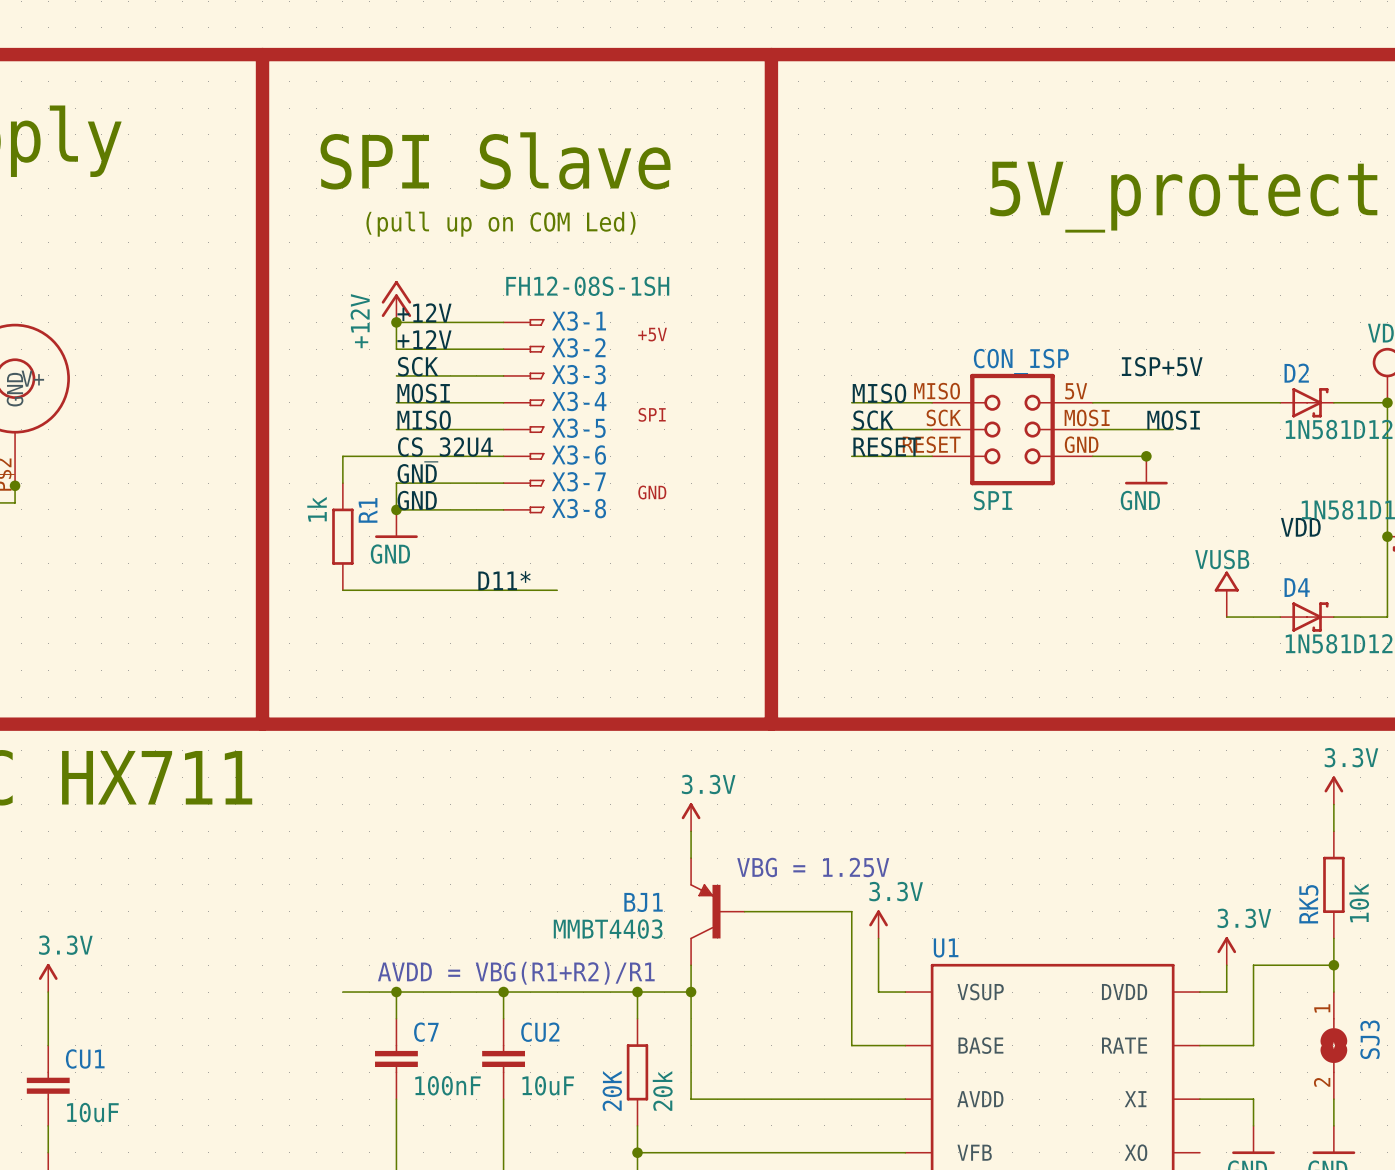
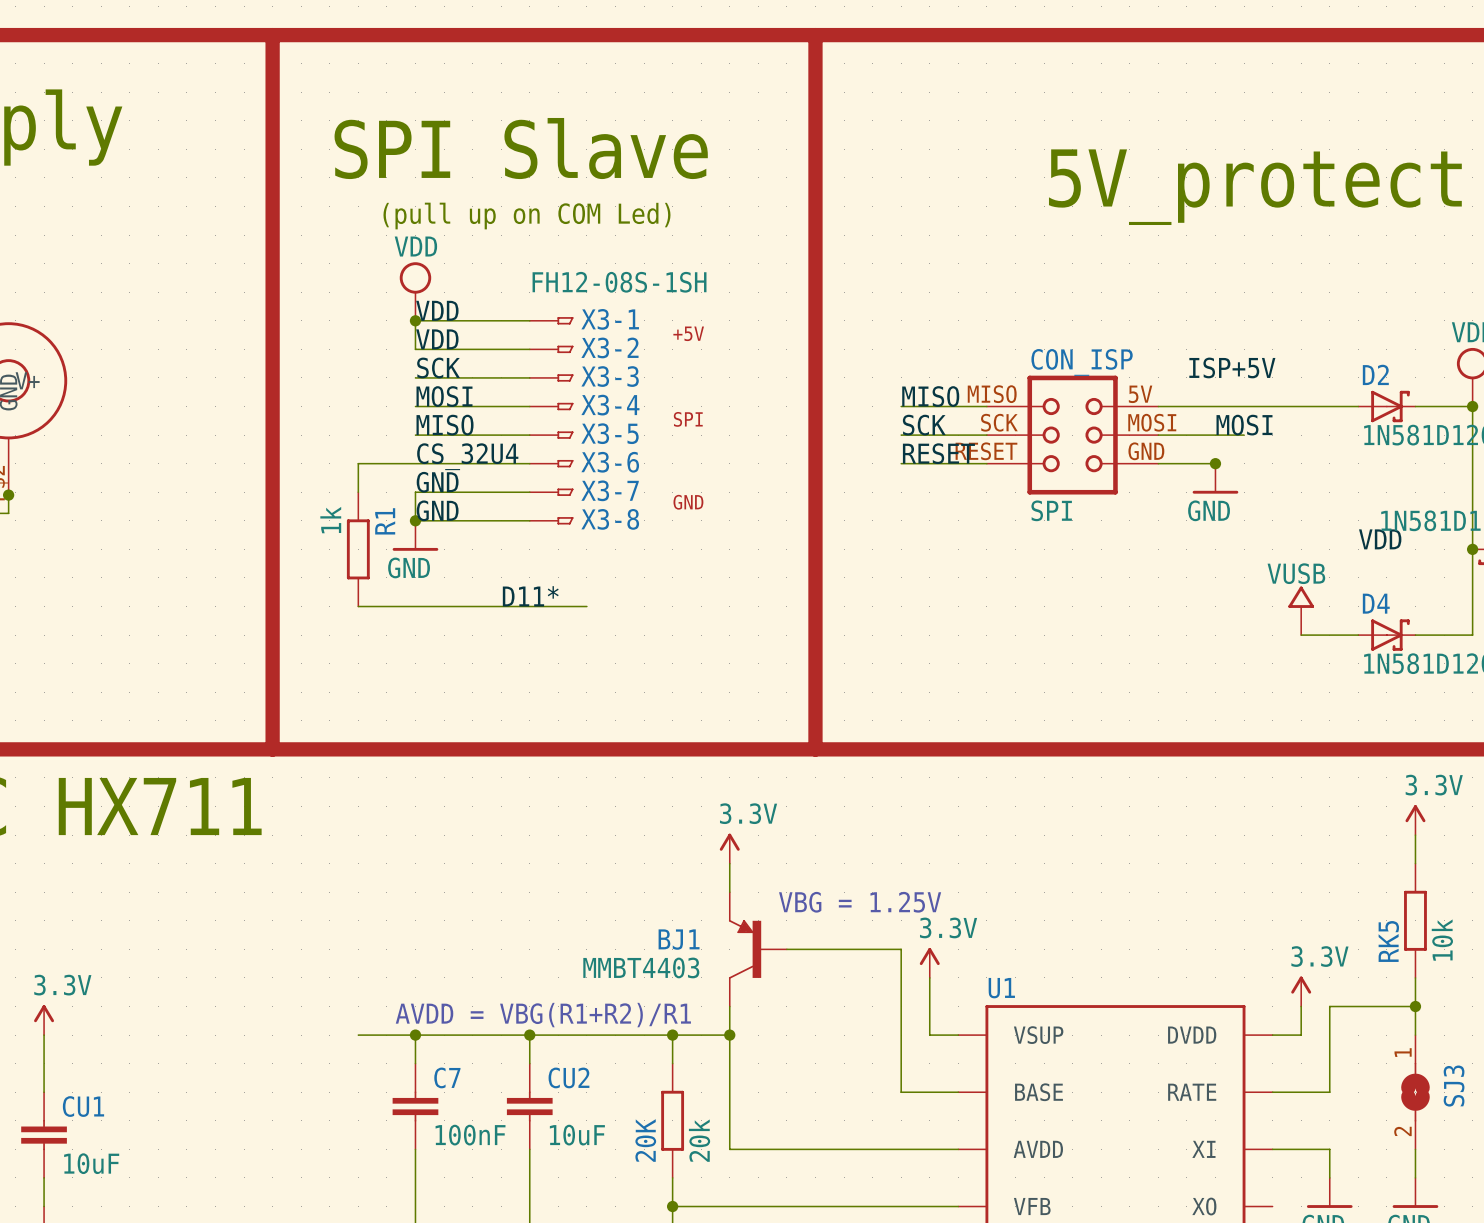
power symbol: +12V (396, 301) -> VDD (415, 291)
label: +12V (424, 312) -> VDD (437, 310)
label: +12V (424, 339) -> VDD (437, 339)

